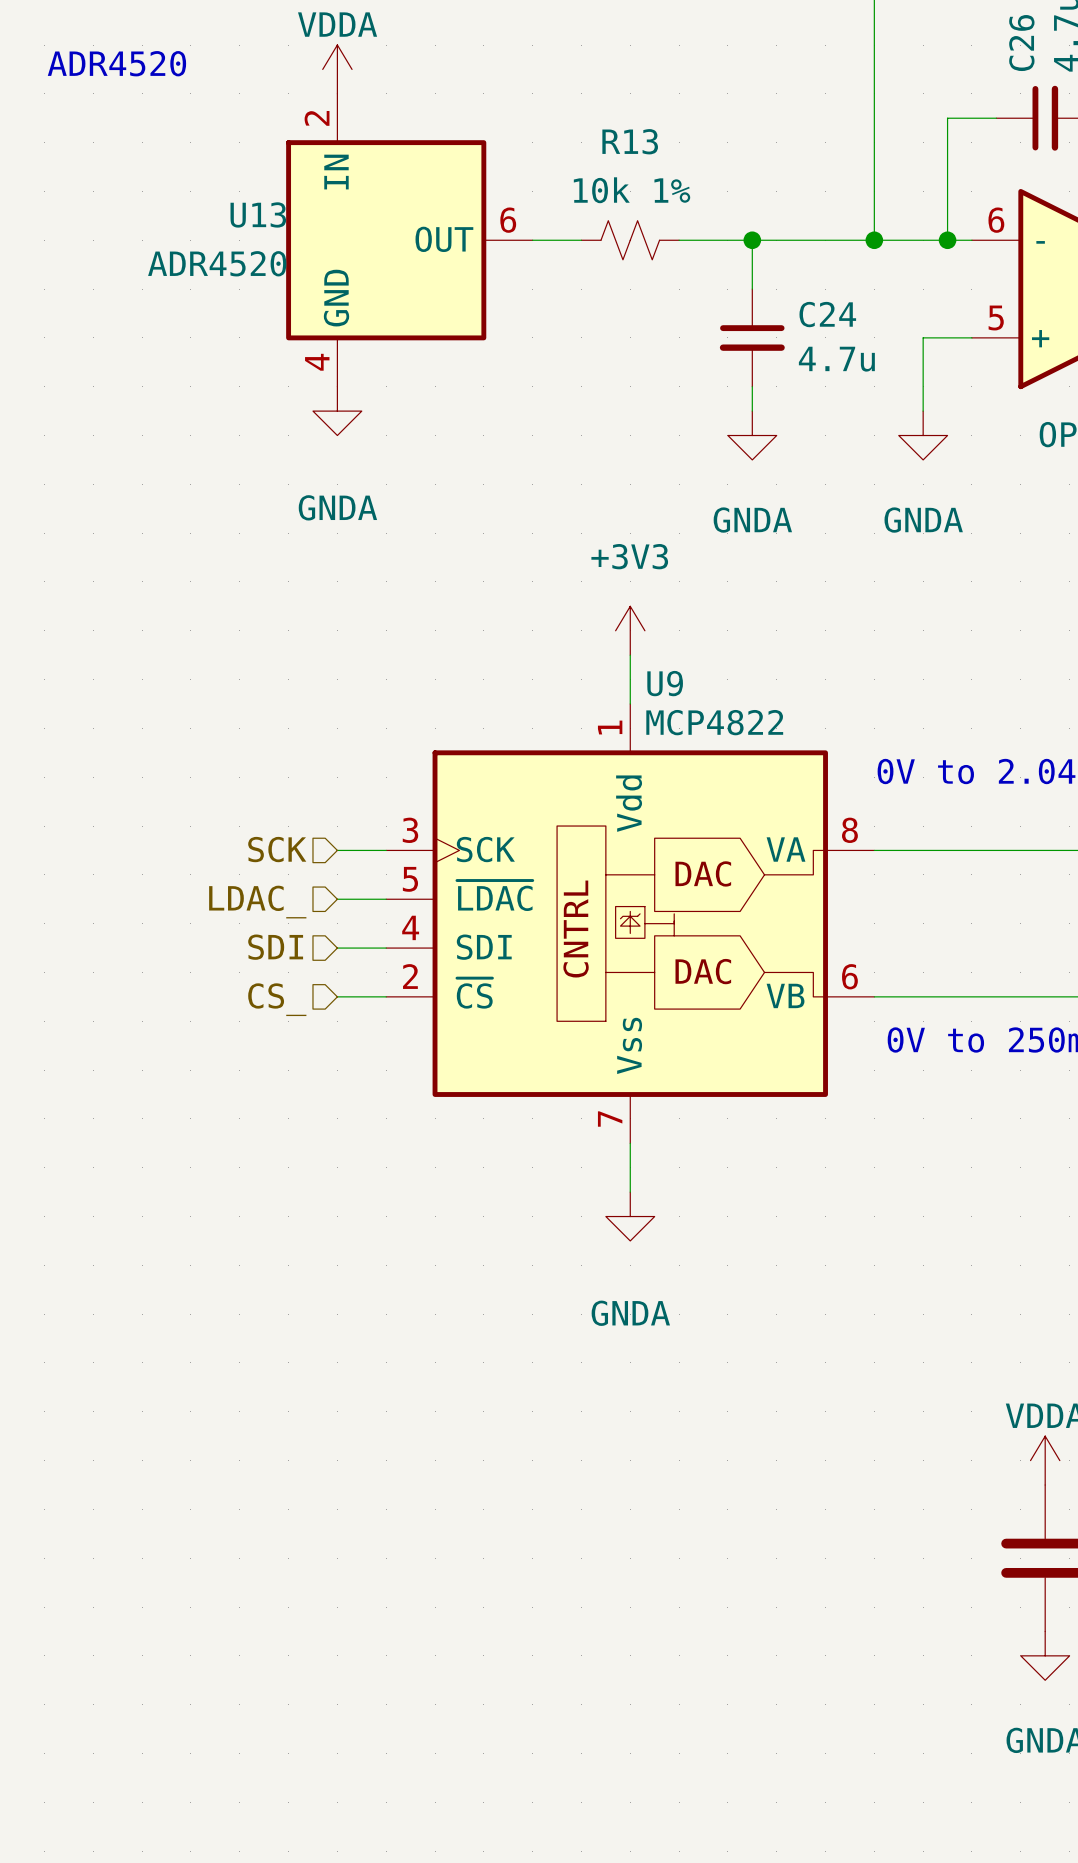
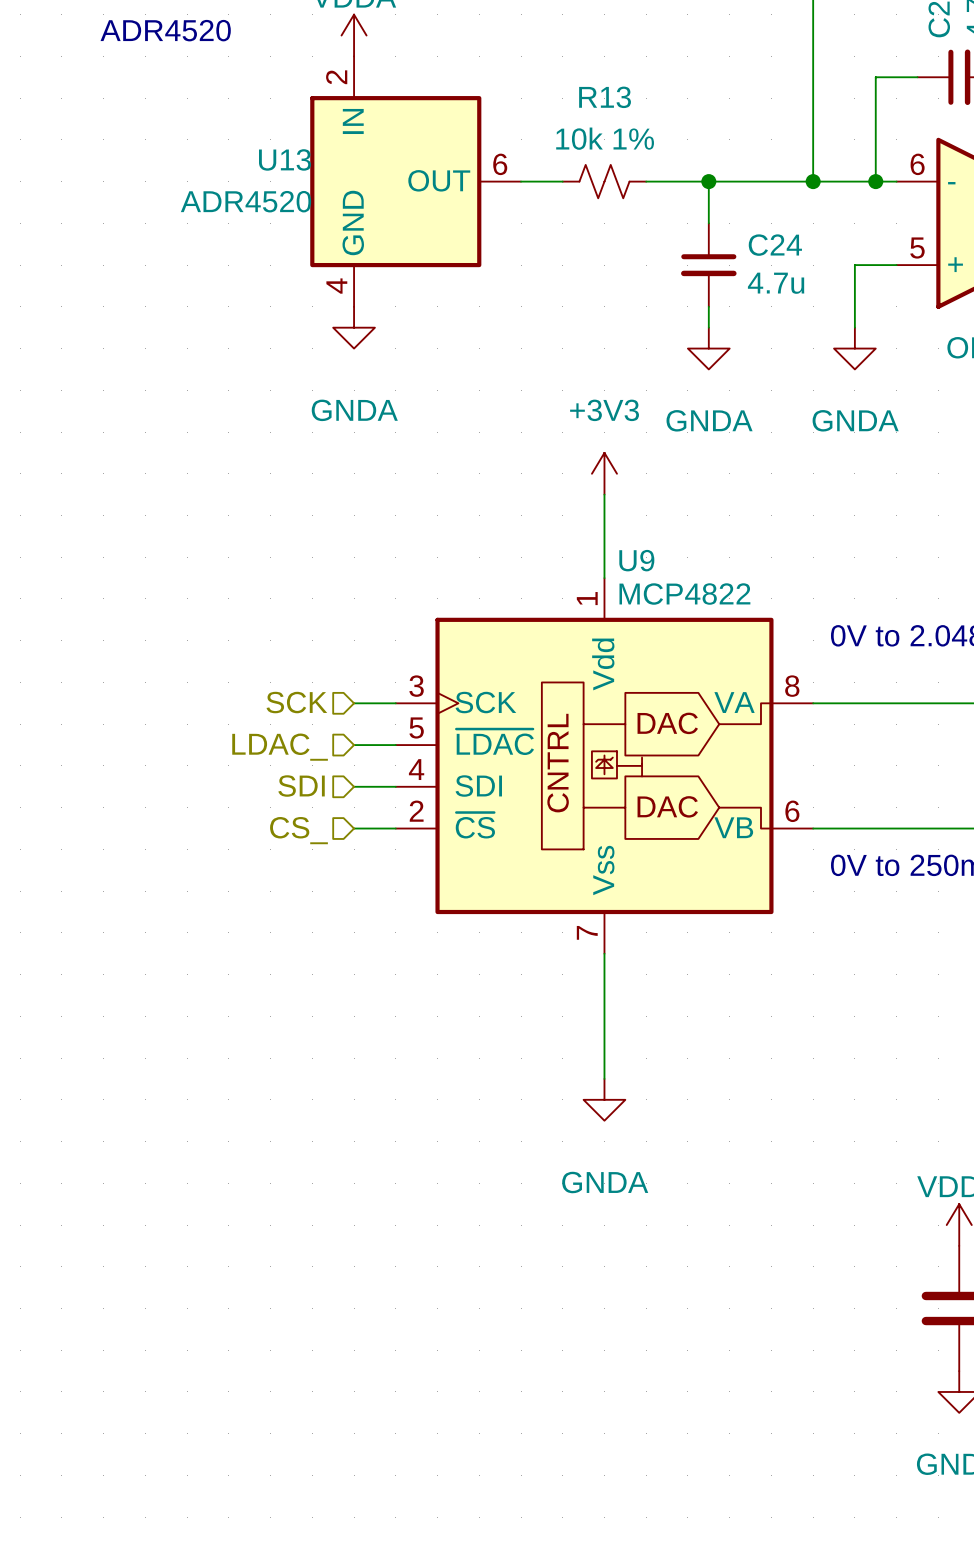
power symbol position: +3V3 (630, 630) -> +3V3 (604, 473)
wire: none -> (604, 995) (604, 1078)
power symbol position: GNDA (630, 1216) -> GNDA (604, 1099)

